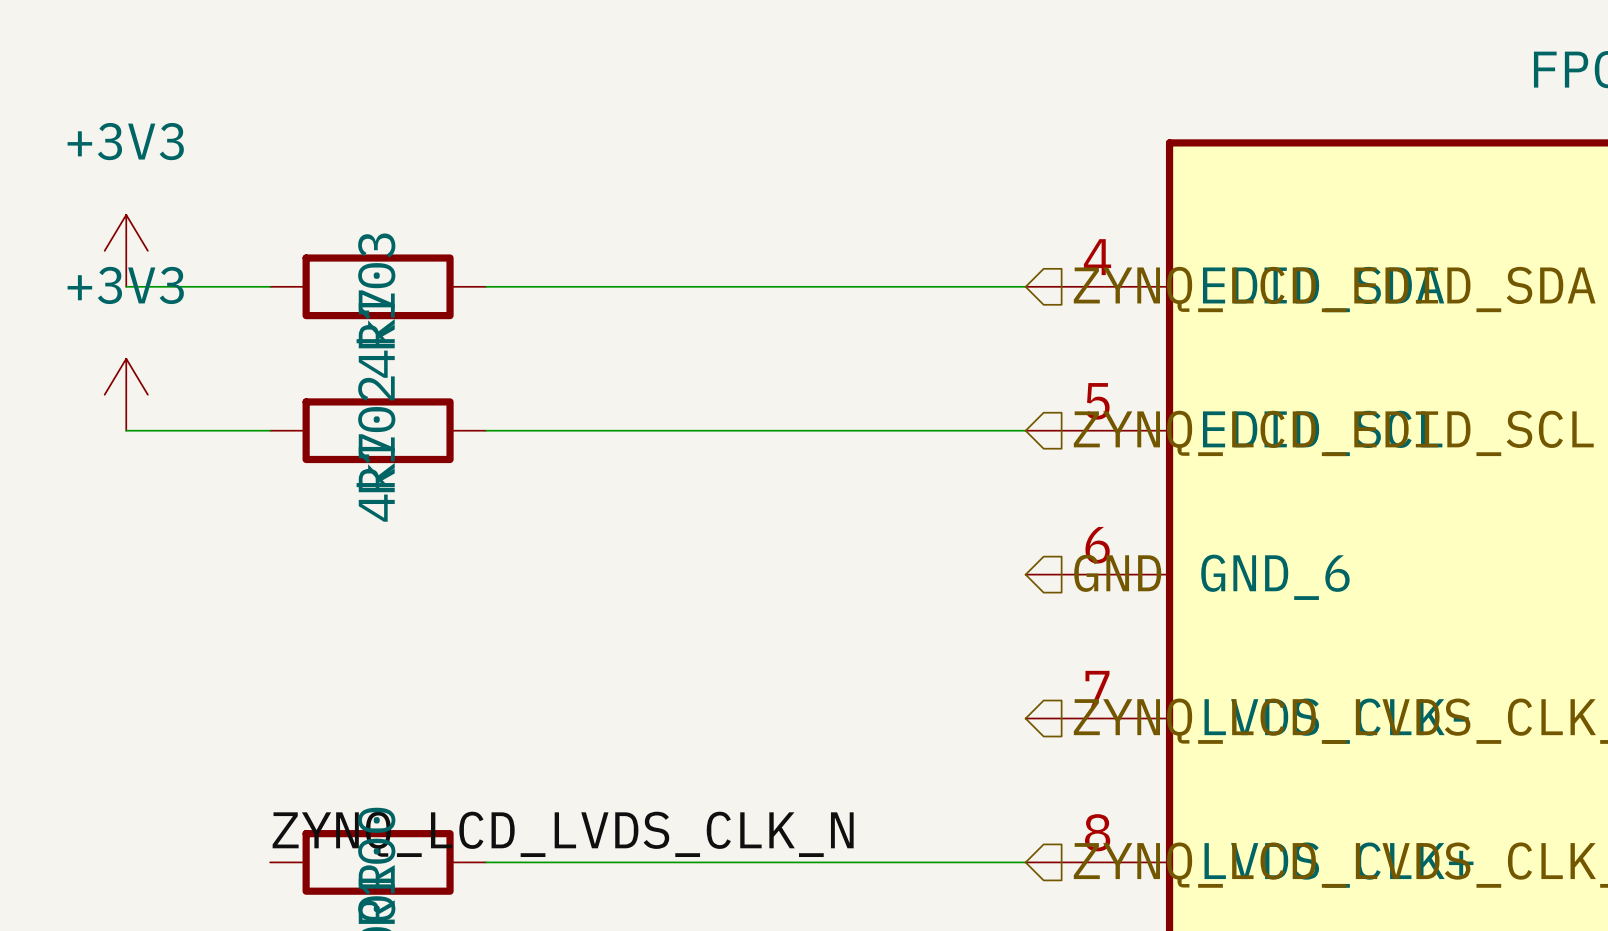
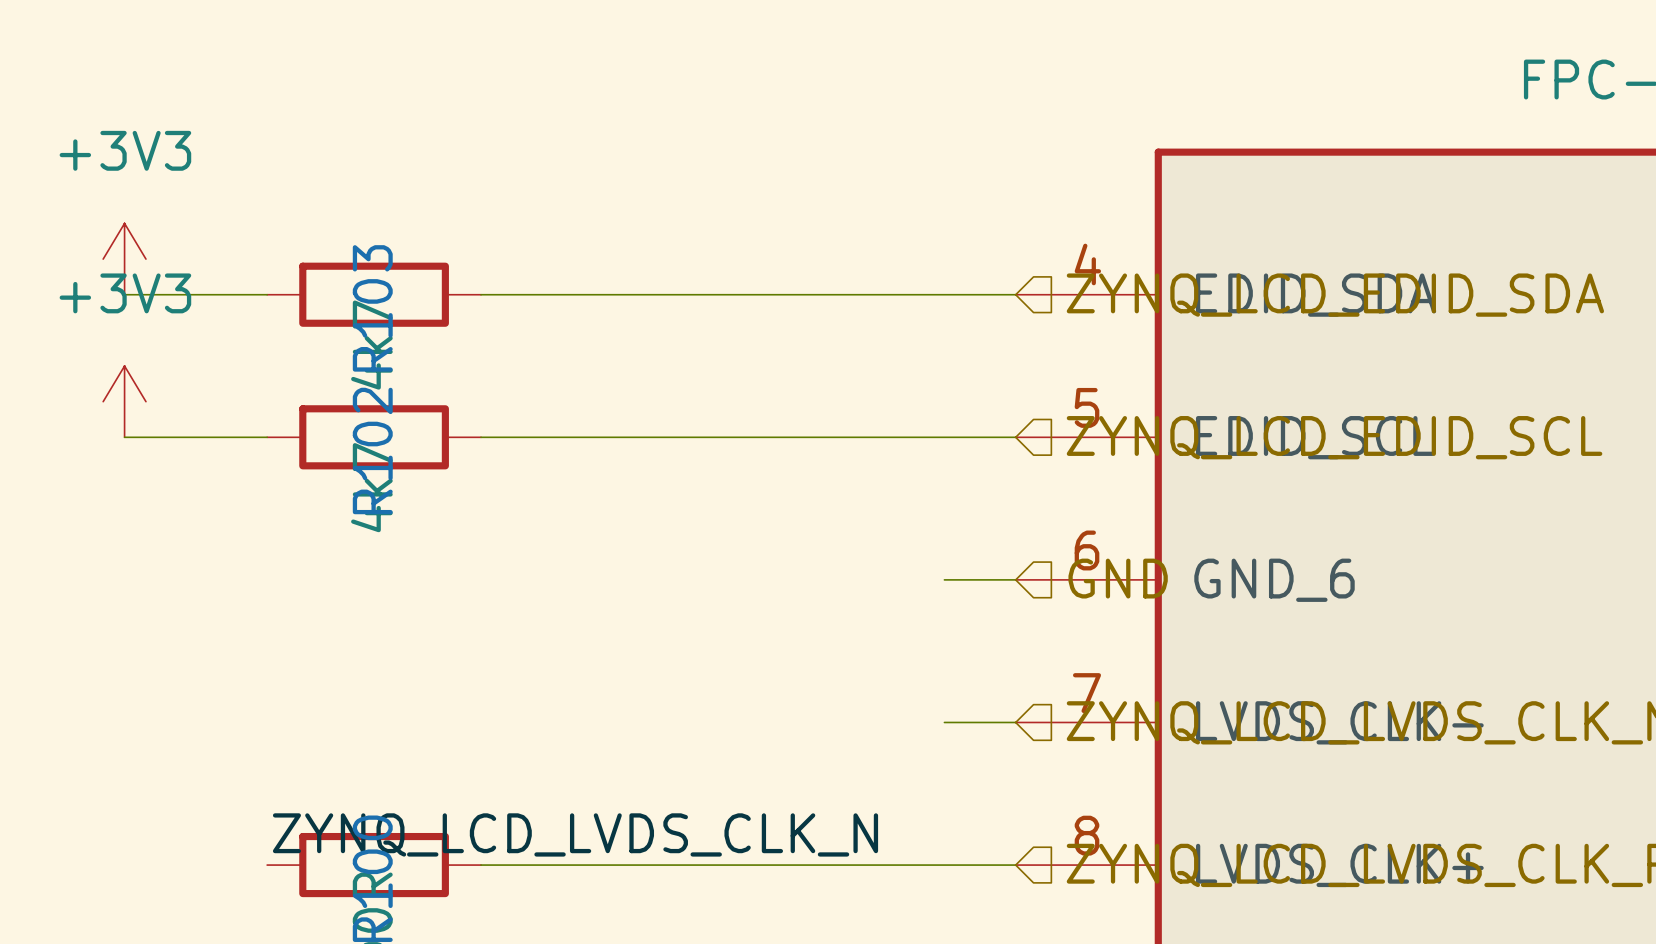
wire: none -> (944, 579) (1015, 579)
wire: none -> (944, 722) (1015, 722)

